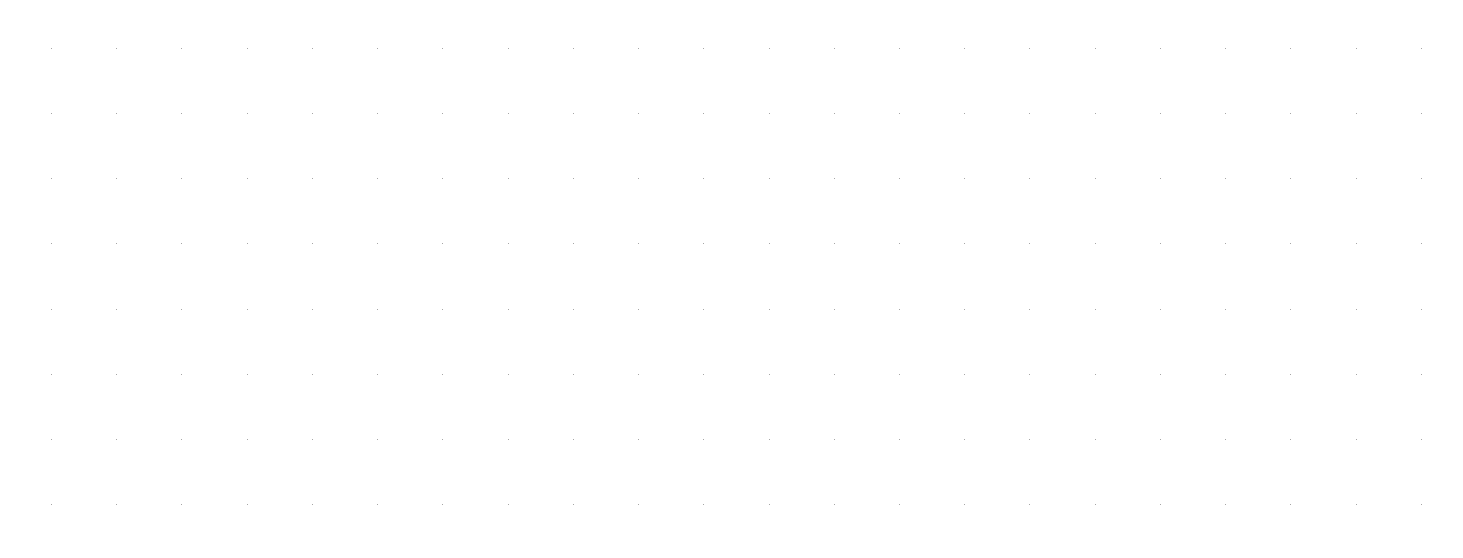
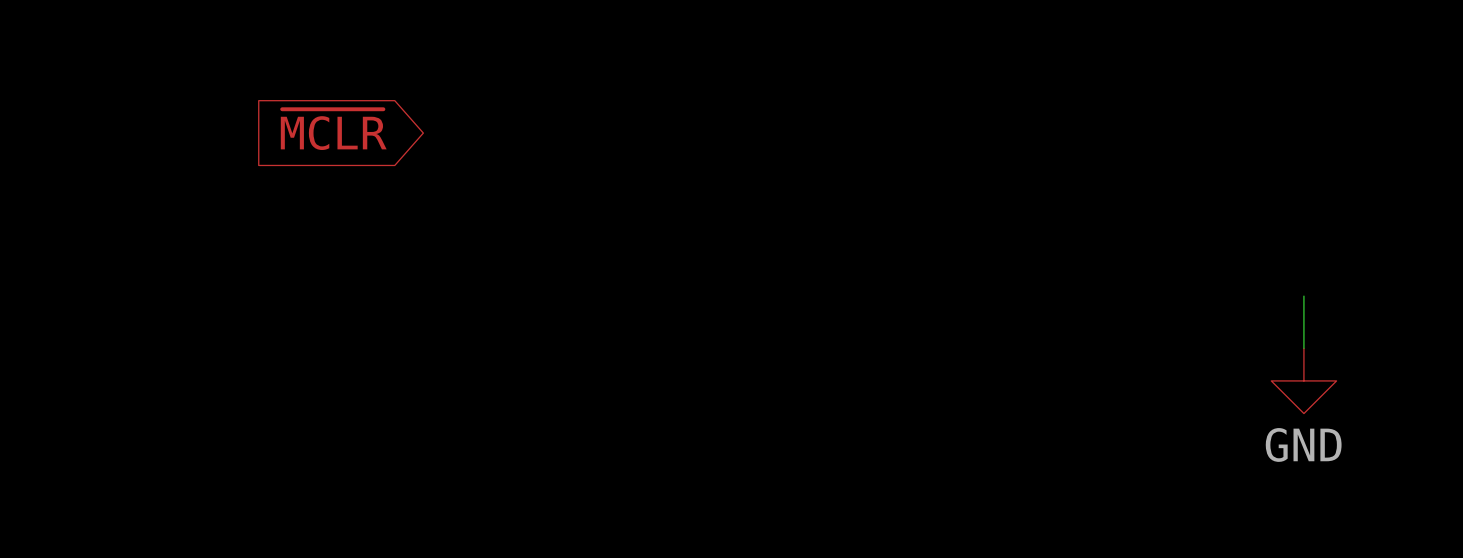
global label: none -> ~{MCLR} (333, 129)
wire: none -> (1303, 296) (1303, 348)
power symbol: none -> GND (1303, 380)

